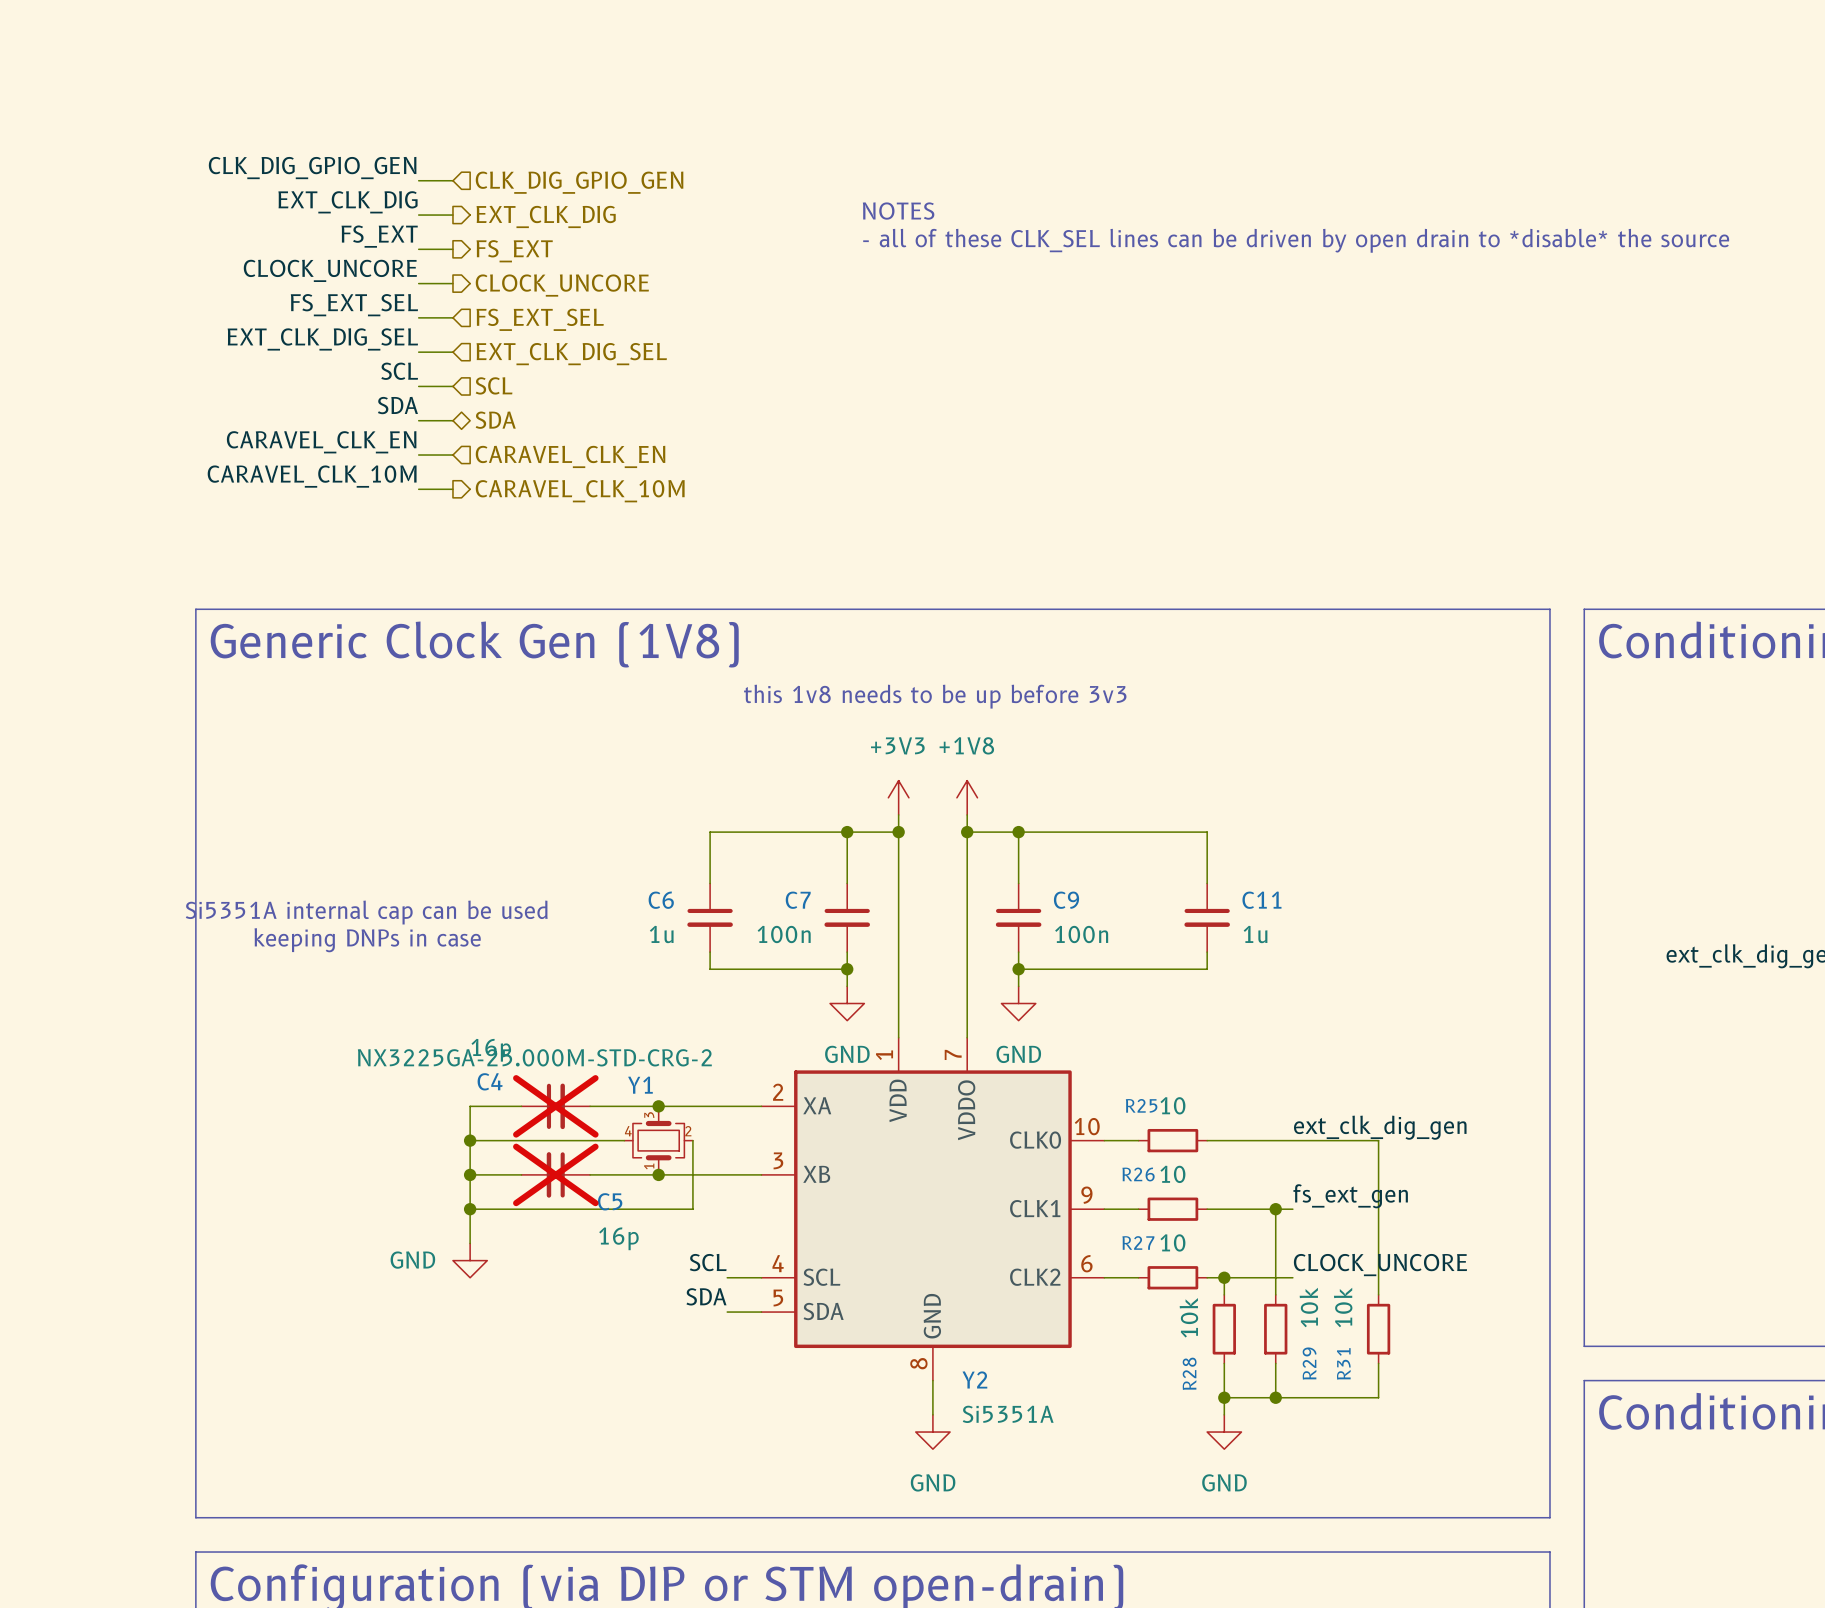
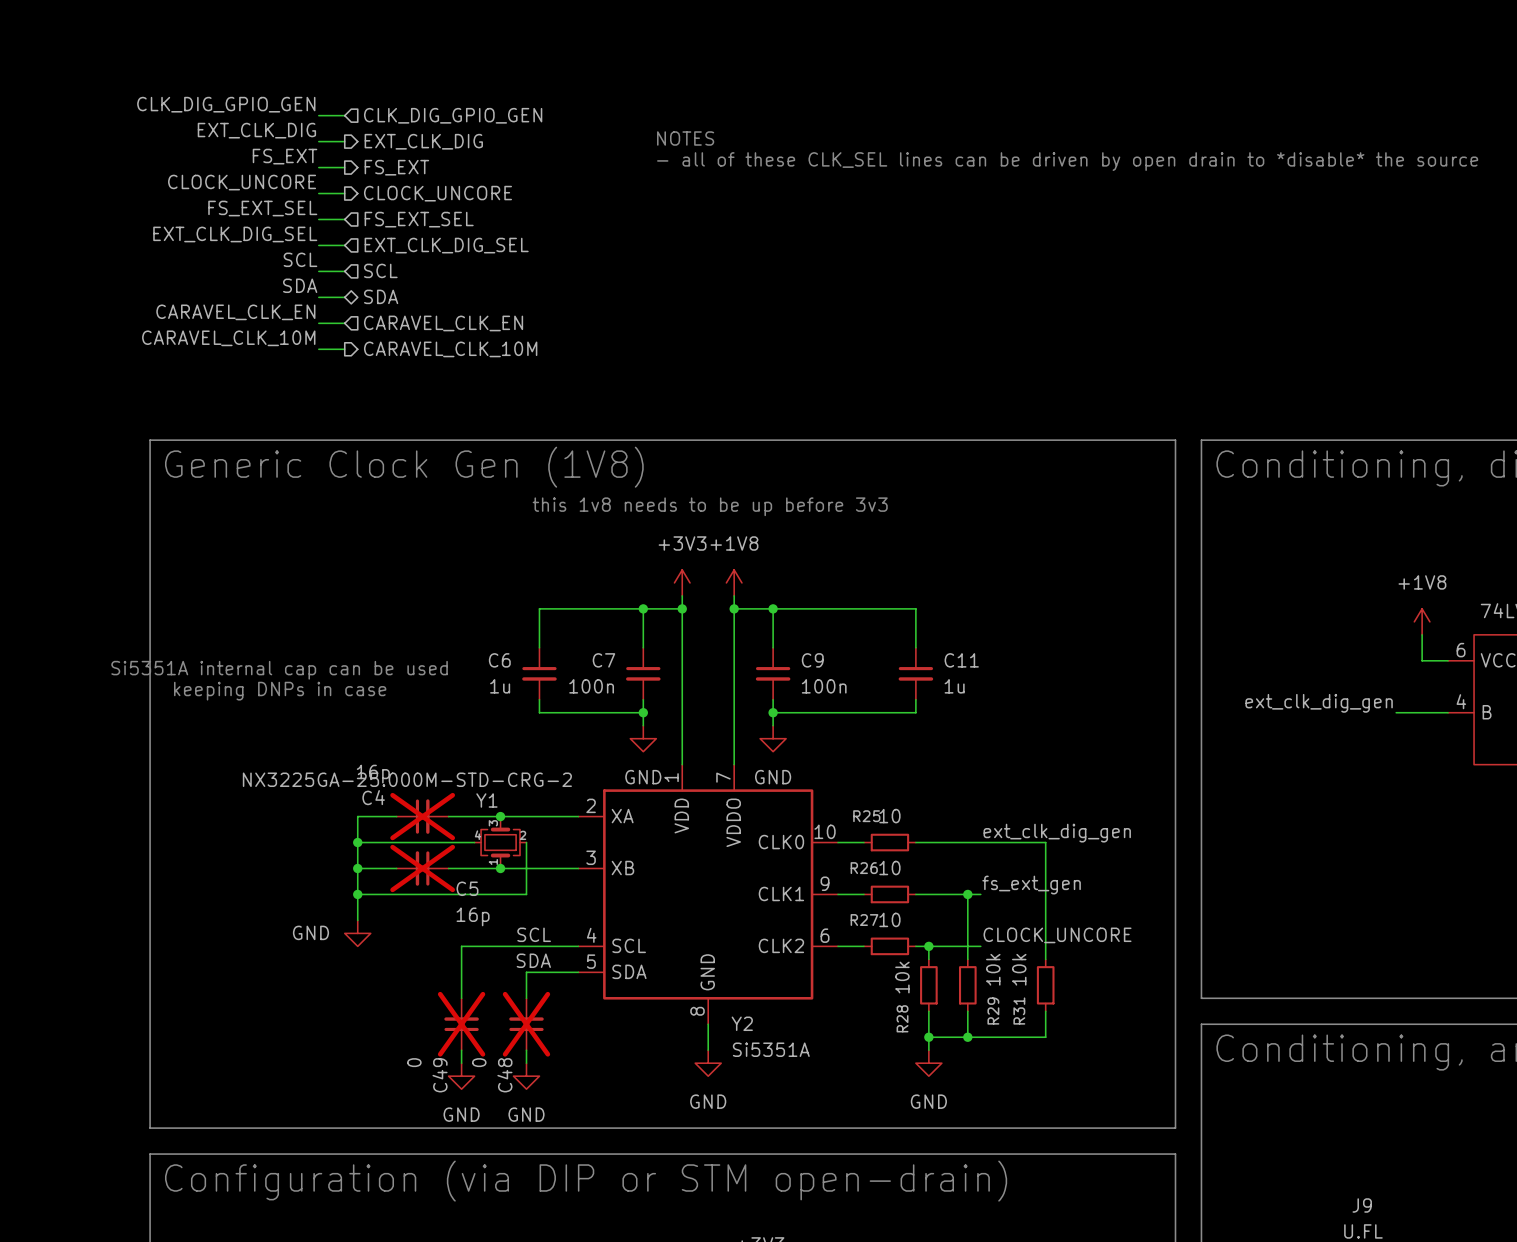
wire: none -> (552, 946) (461, 946) (461, 998)
wire: none -> (552, 972) (526, 972) (526, 998)
C49: none -> 0 (461, 1024)
C48: none -> 0 (526, 1024)
wire: none -> (461, 1050) (461, 1063)
wire: none -> (526, 1050) (526, 1063)
power symbol: none -> GND (461, 1076)
power symbol: none -> GND (526, 1076)

